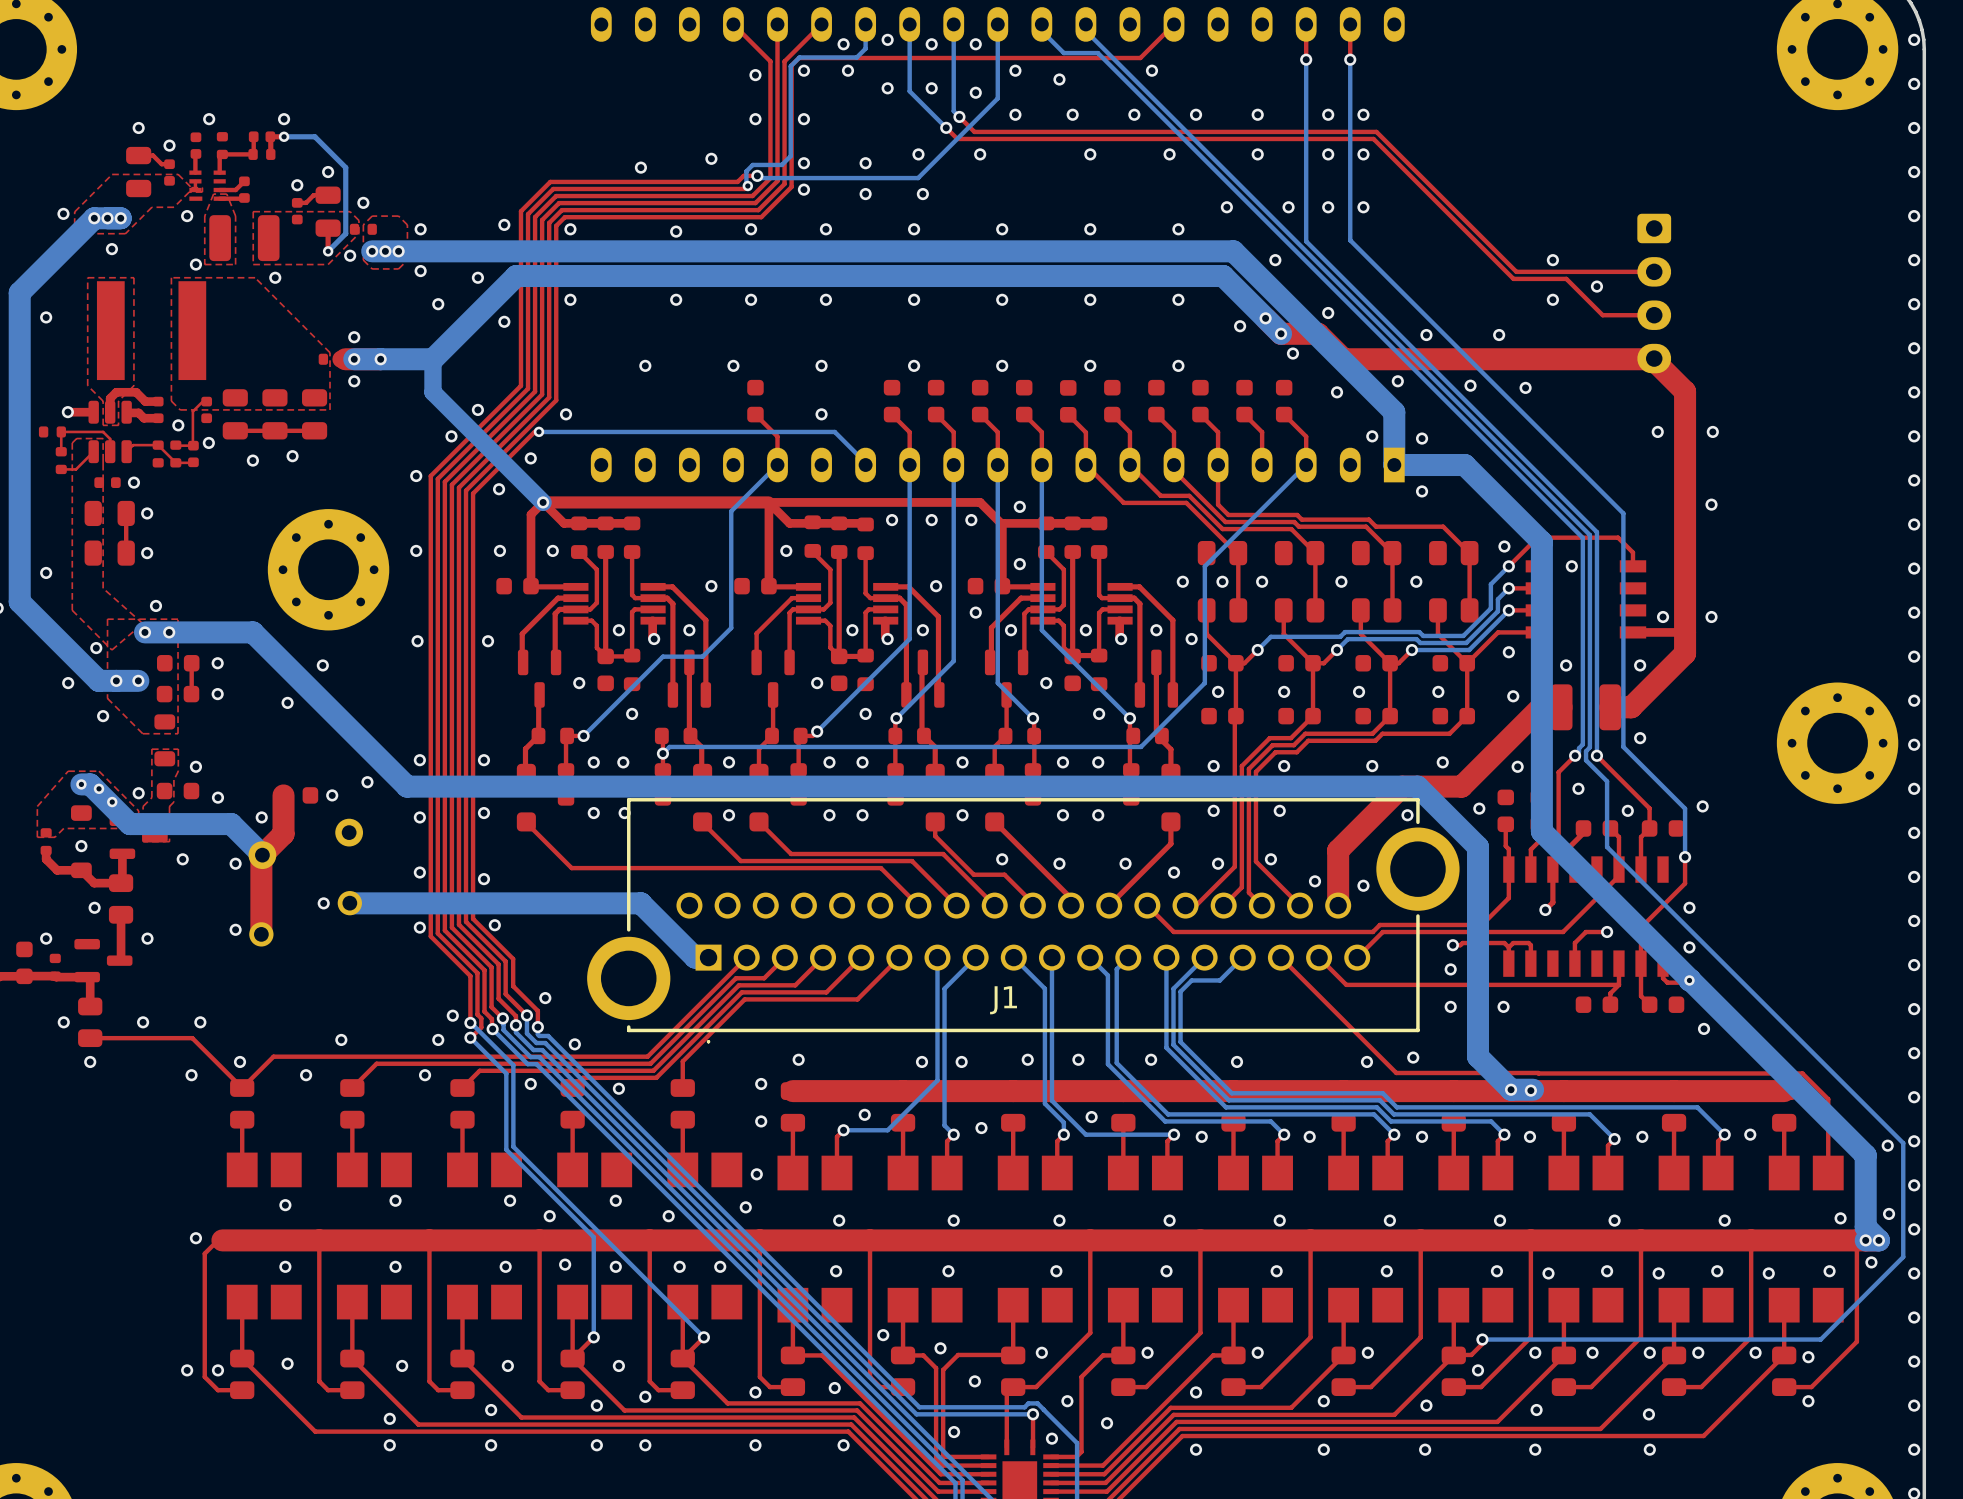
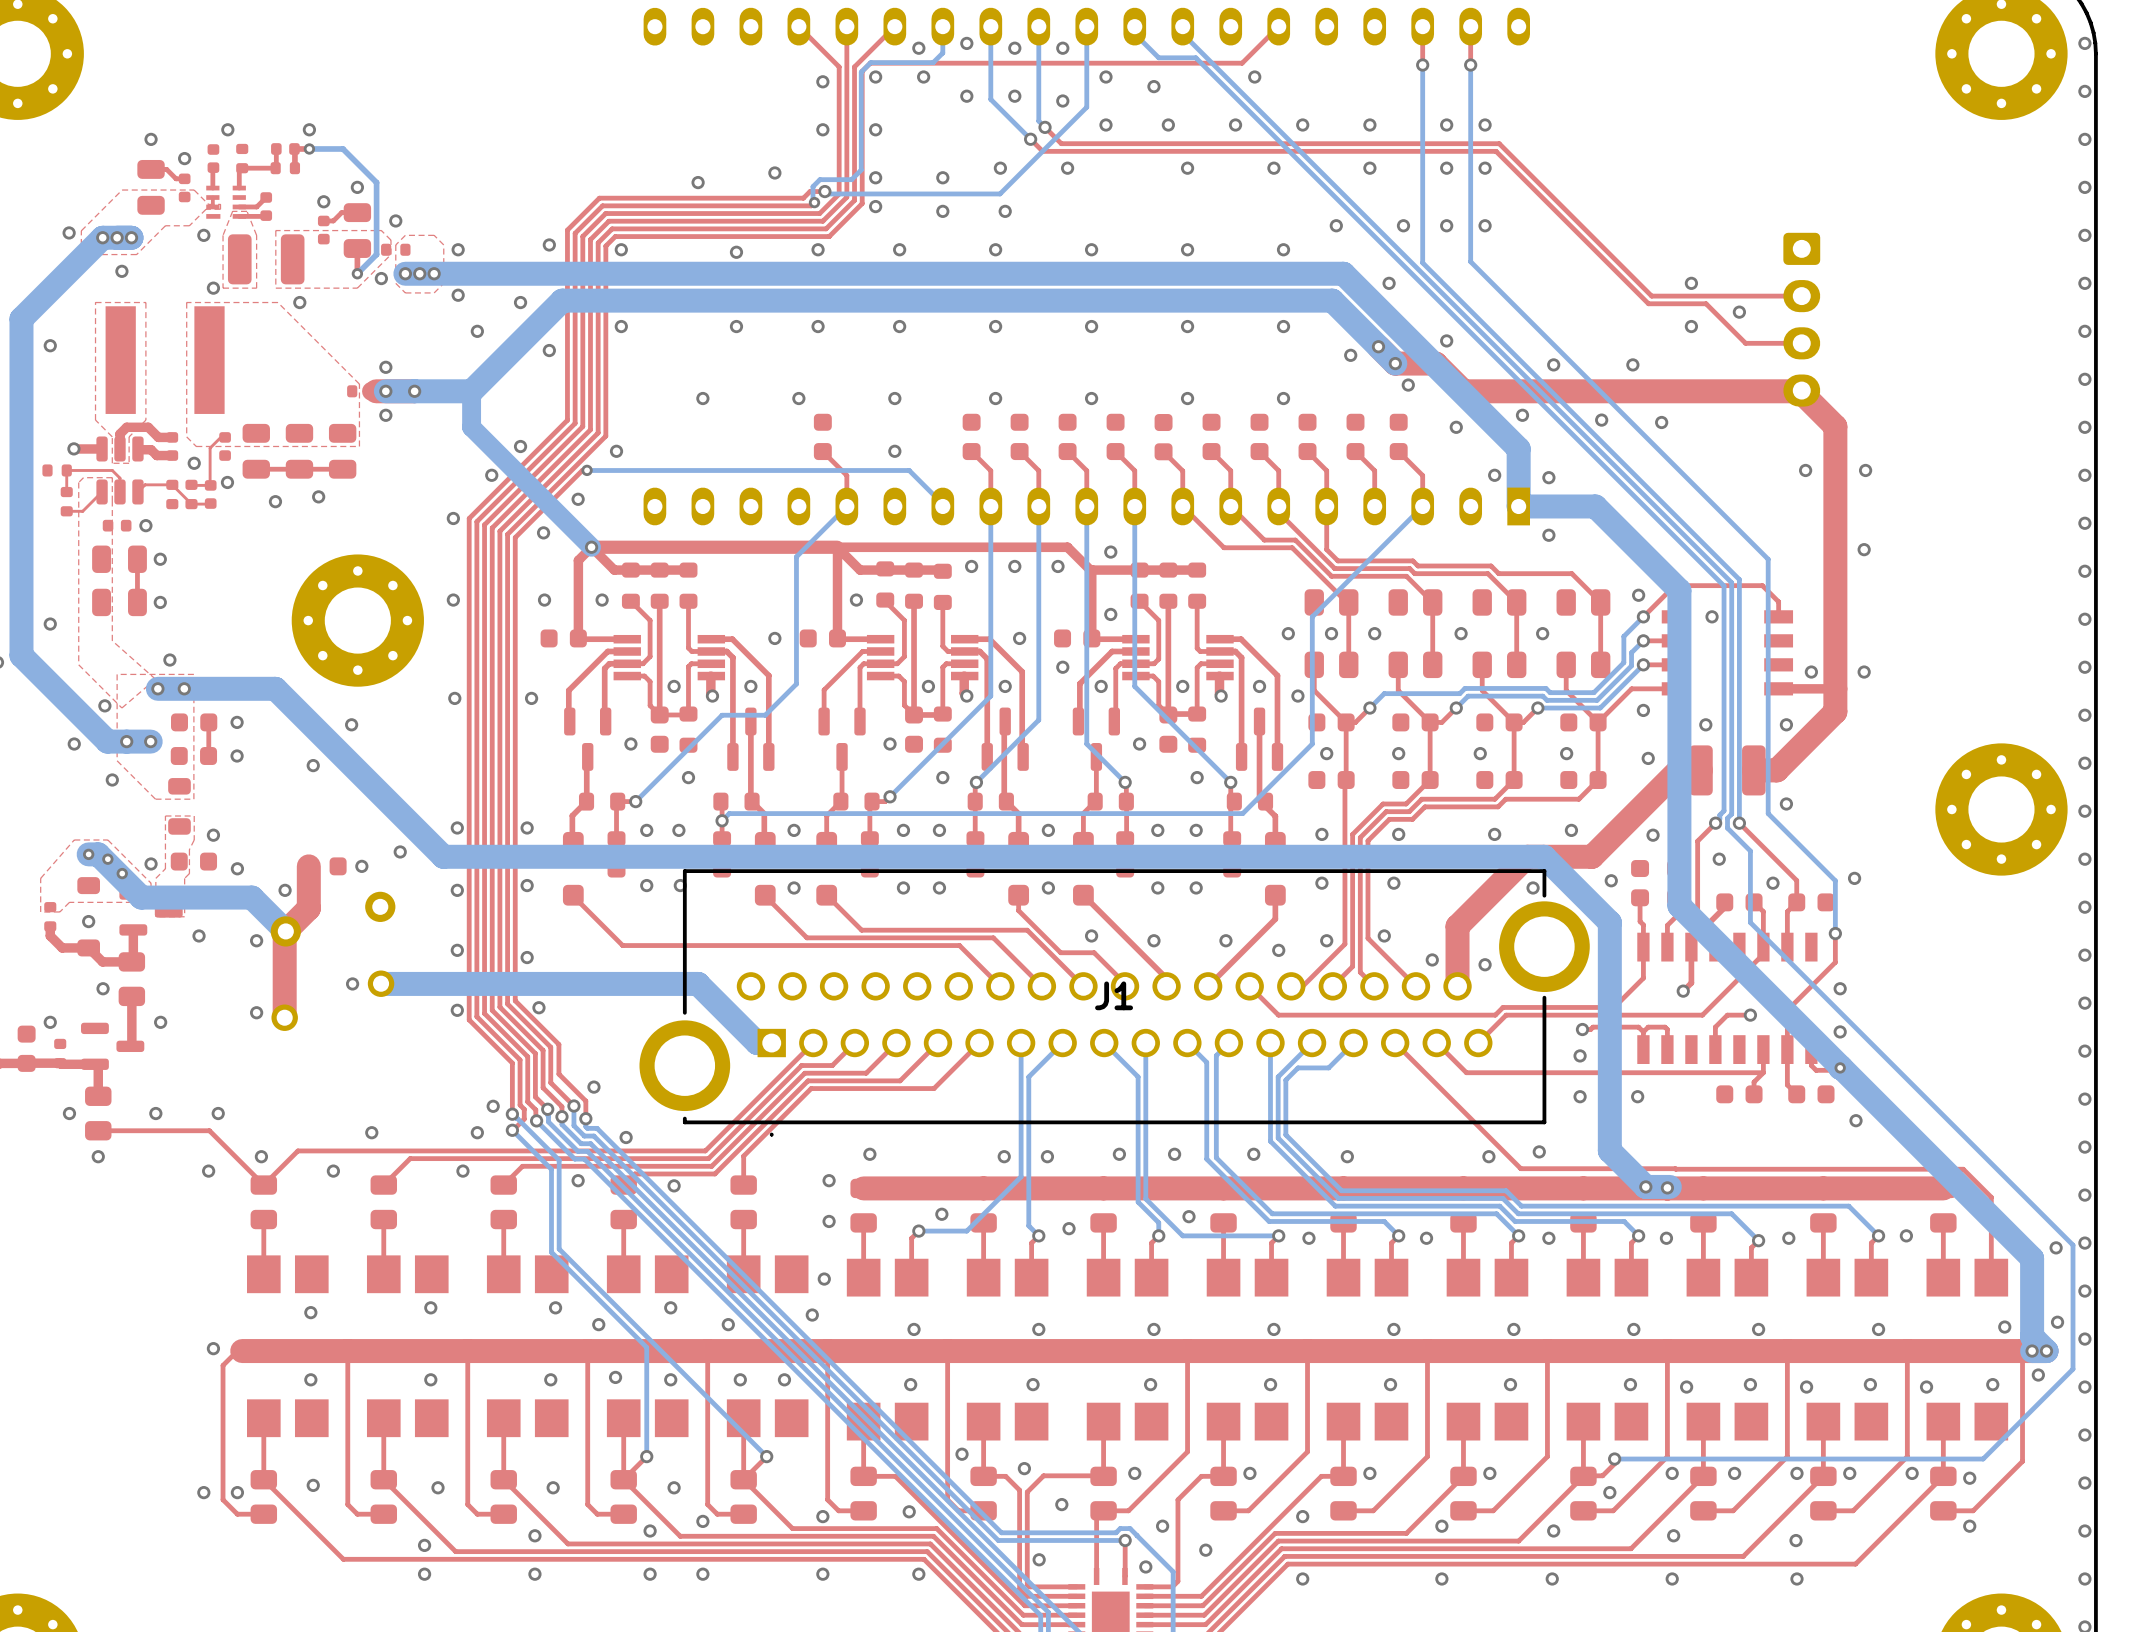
J1 name position: J1 (1003, 1000) -> J1 (1114, 995)

